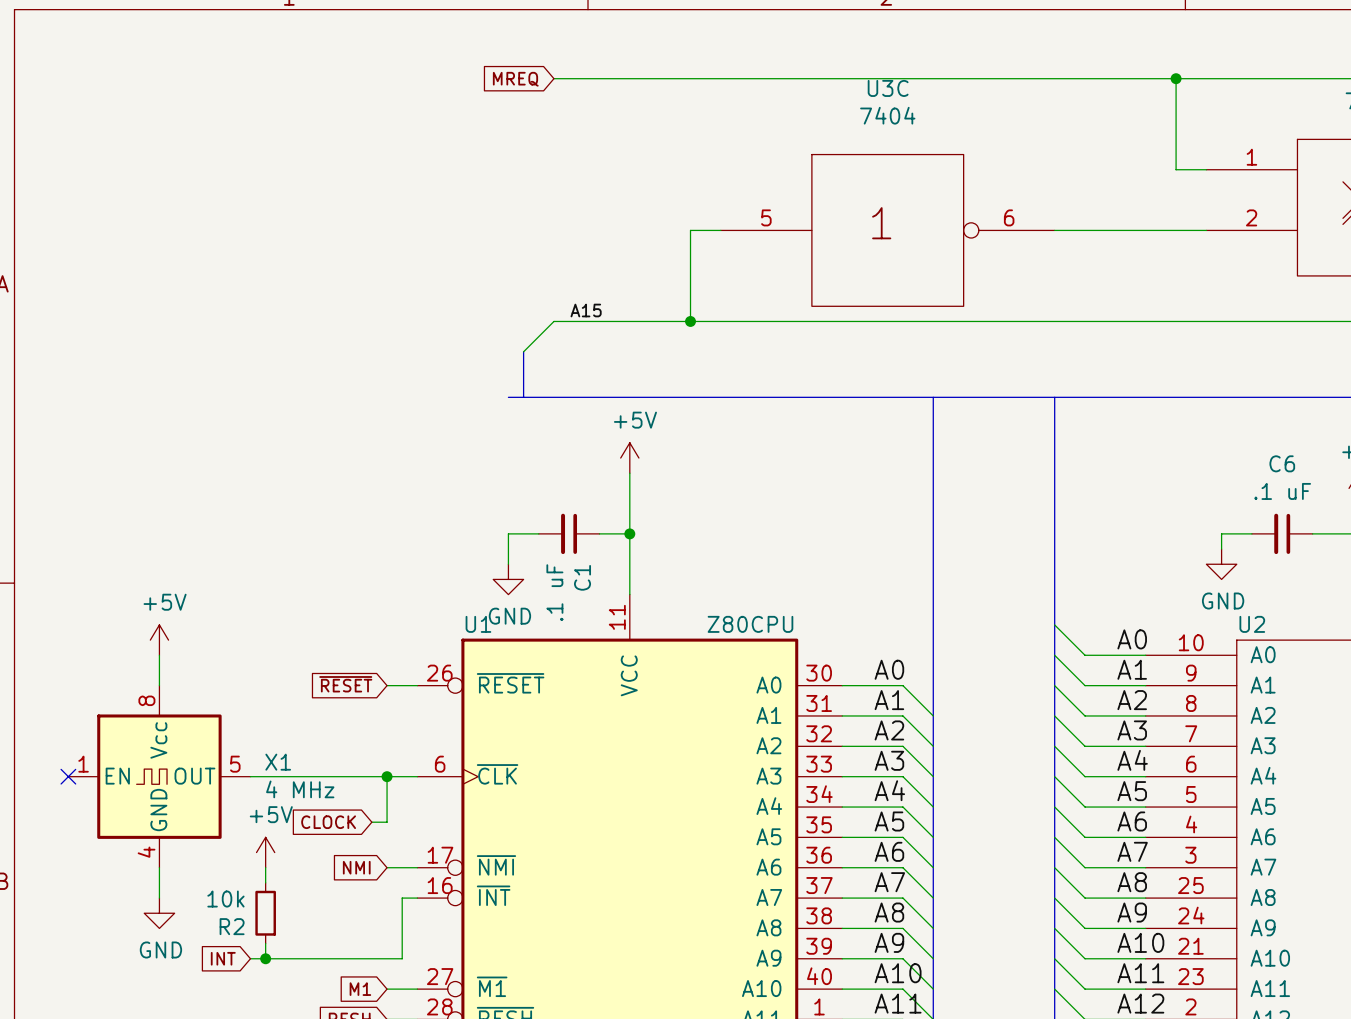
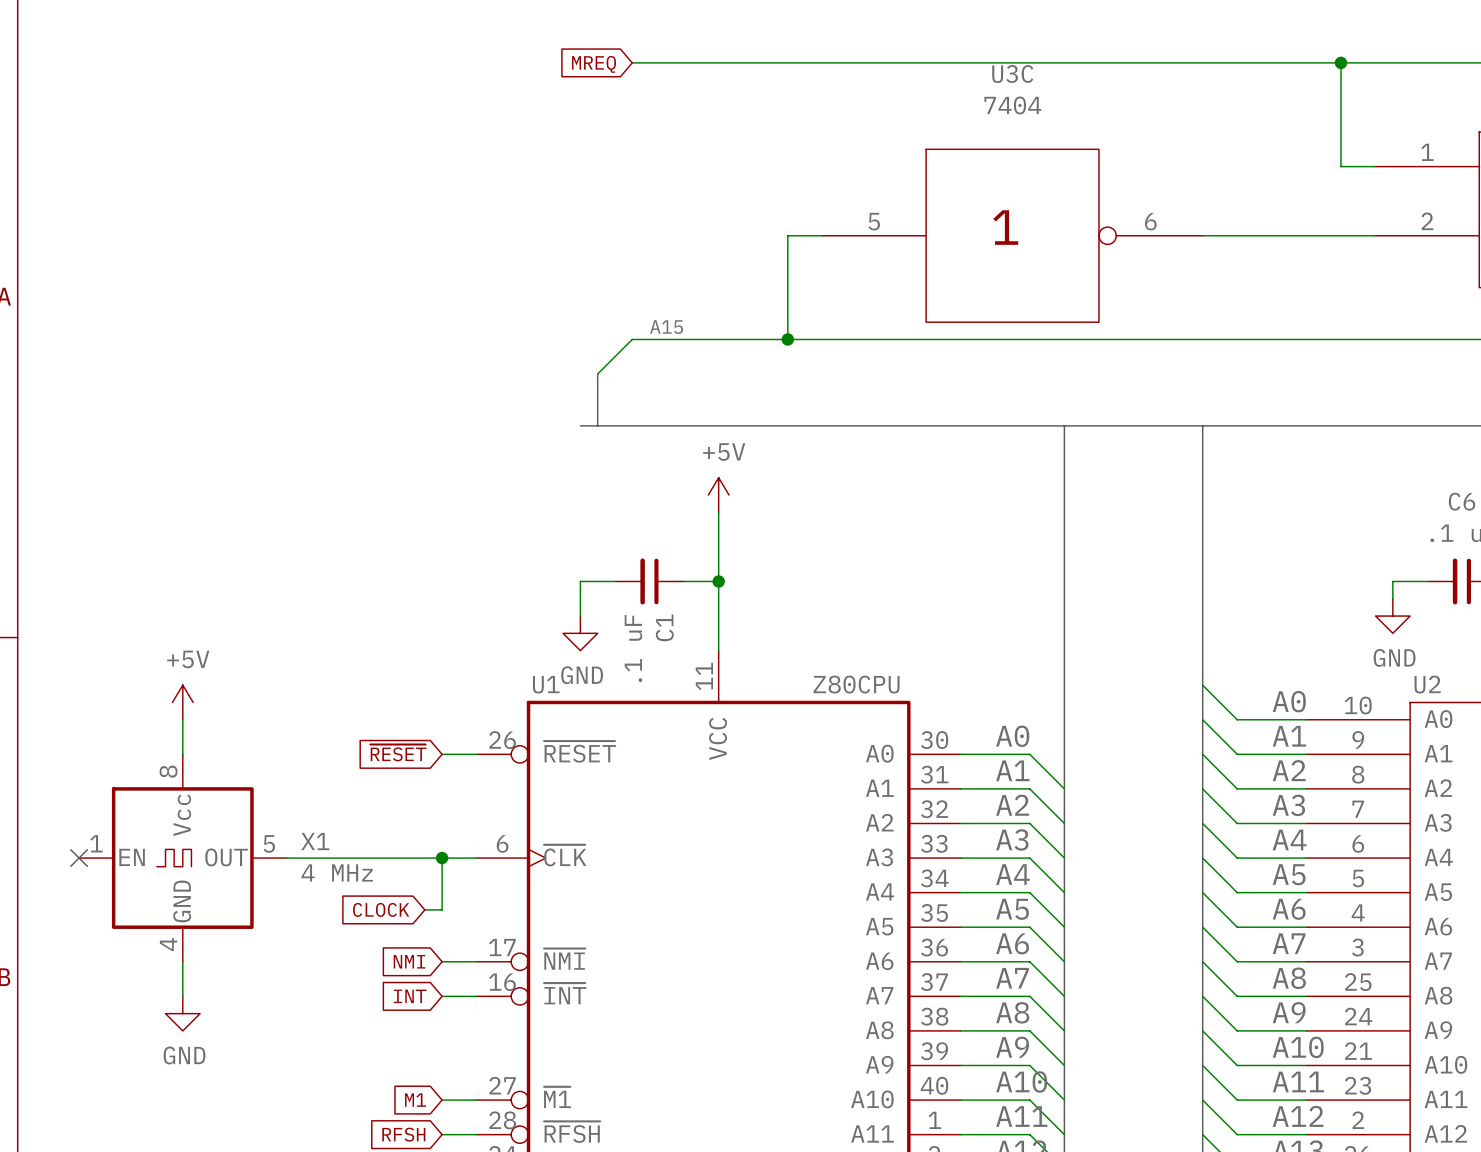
power symbol: +5V (265, 852) -> none
wire: (265, 867) (265, 882) -> none
wire: (402, 898) (402, 958) (250, 958) -> (459, 996) (442, 996)
R2: 10k (265, 913) -> none
wire: (265, 943) (265, 958) -> none
global label position: INT (223, 958) -> INT (410, 996)
junction: (265, 958) -> none

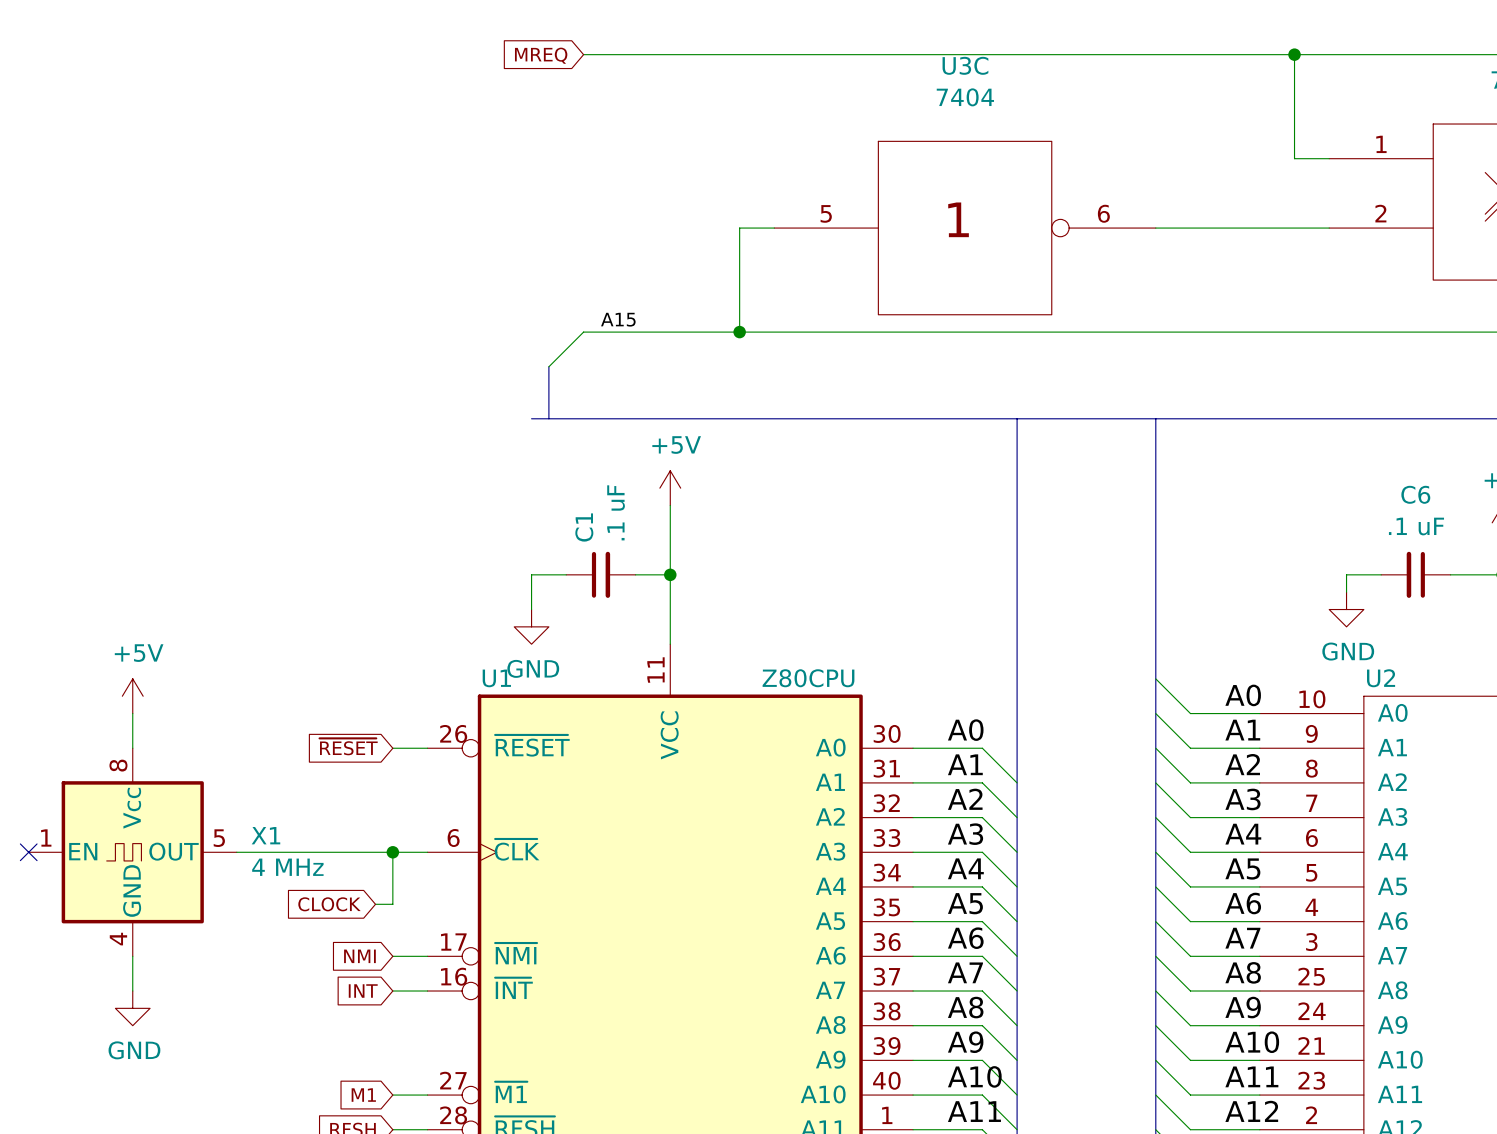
C1 rotation: 0° (649, 581) -> 180° (601, 574)

